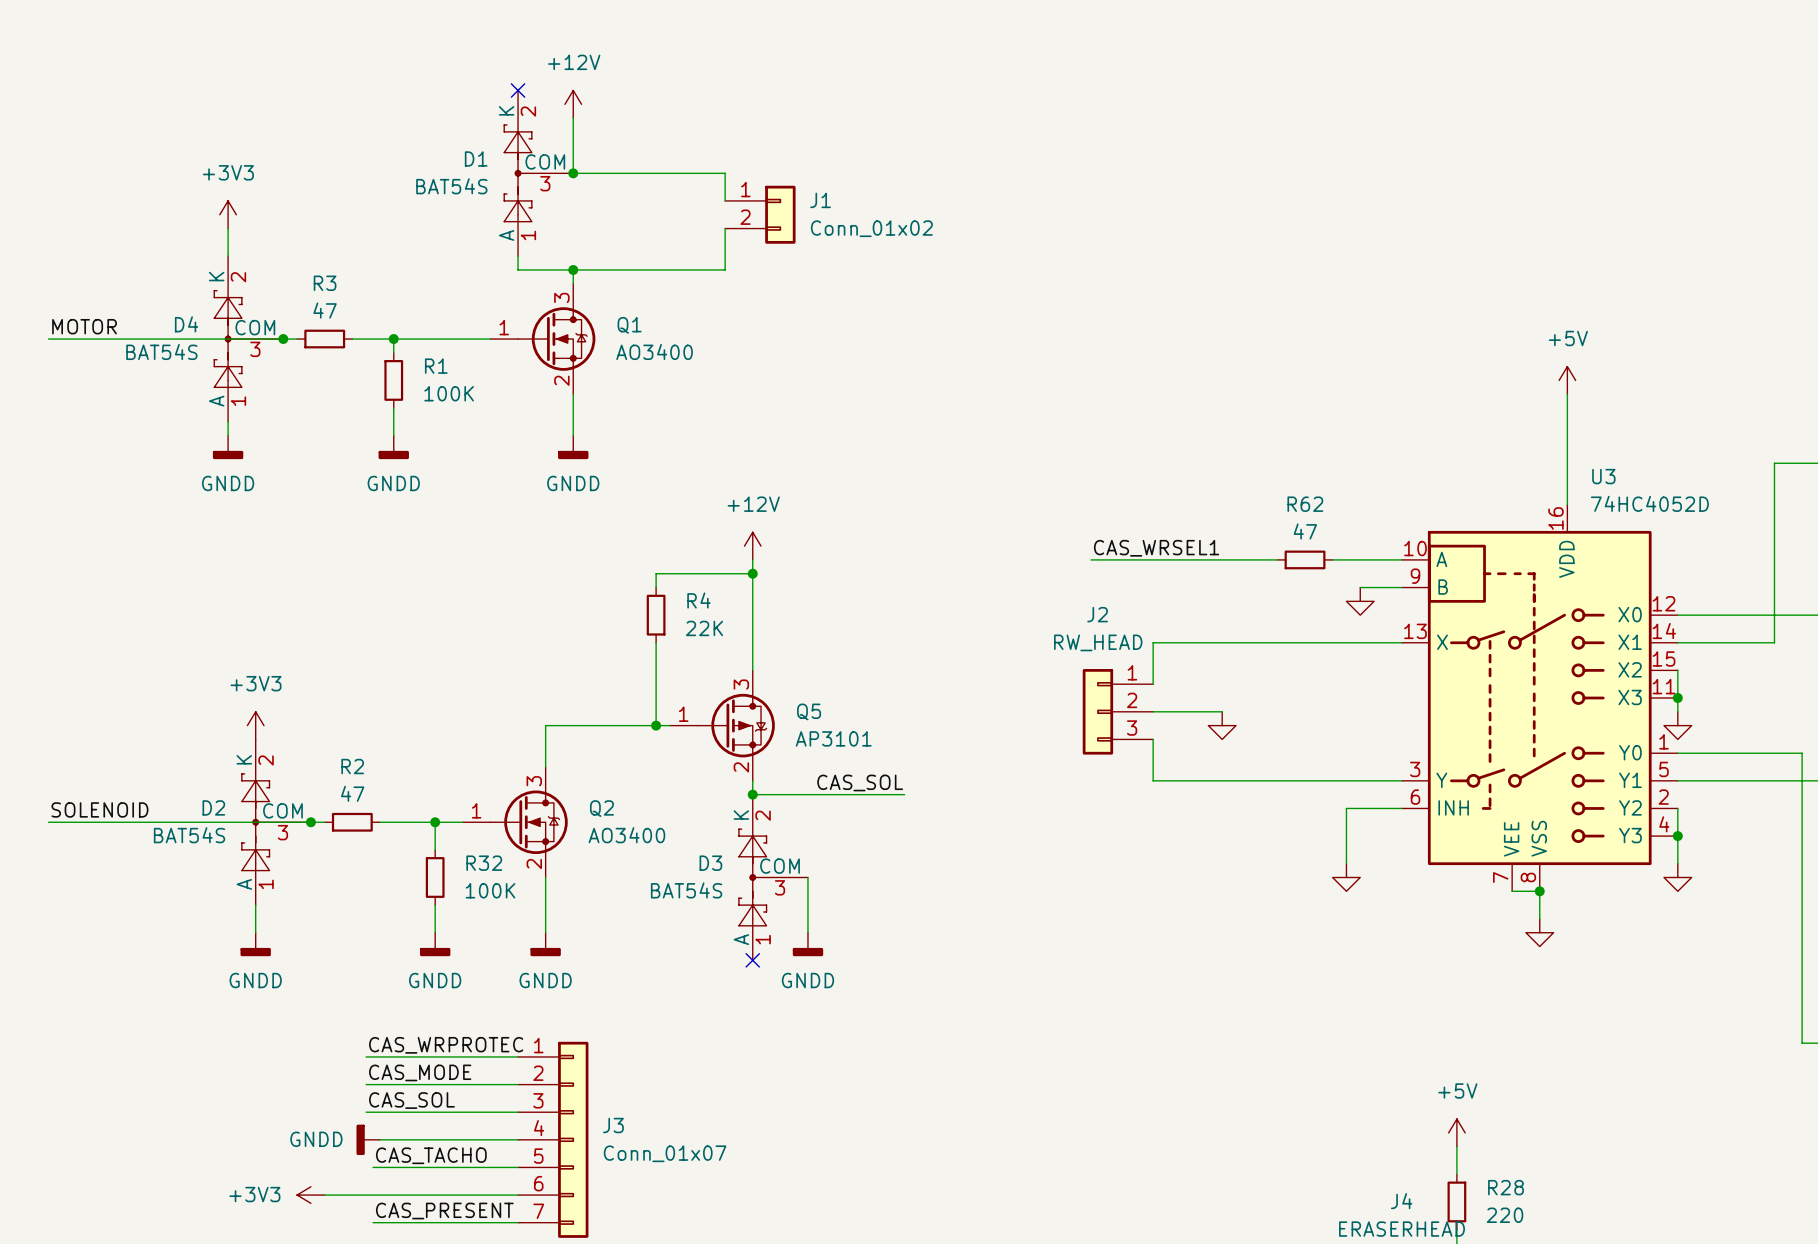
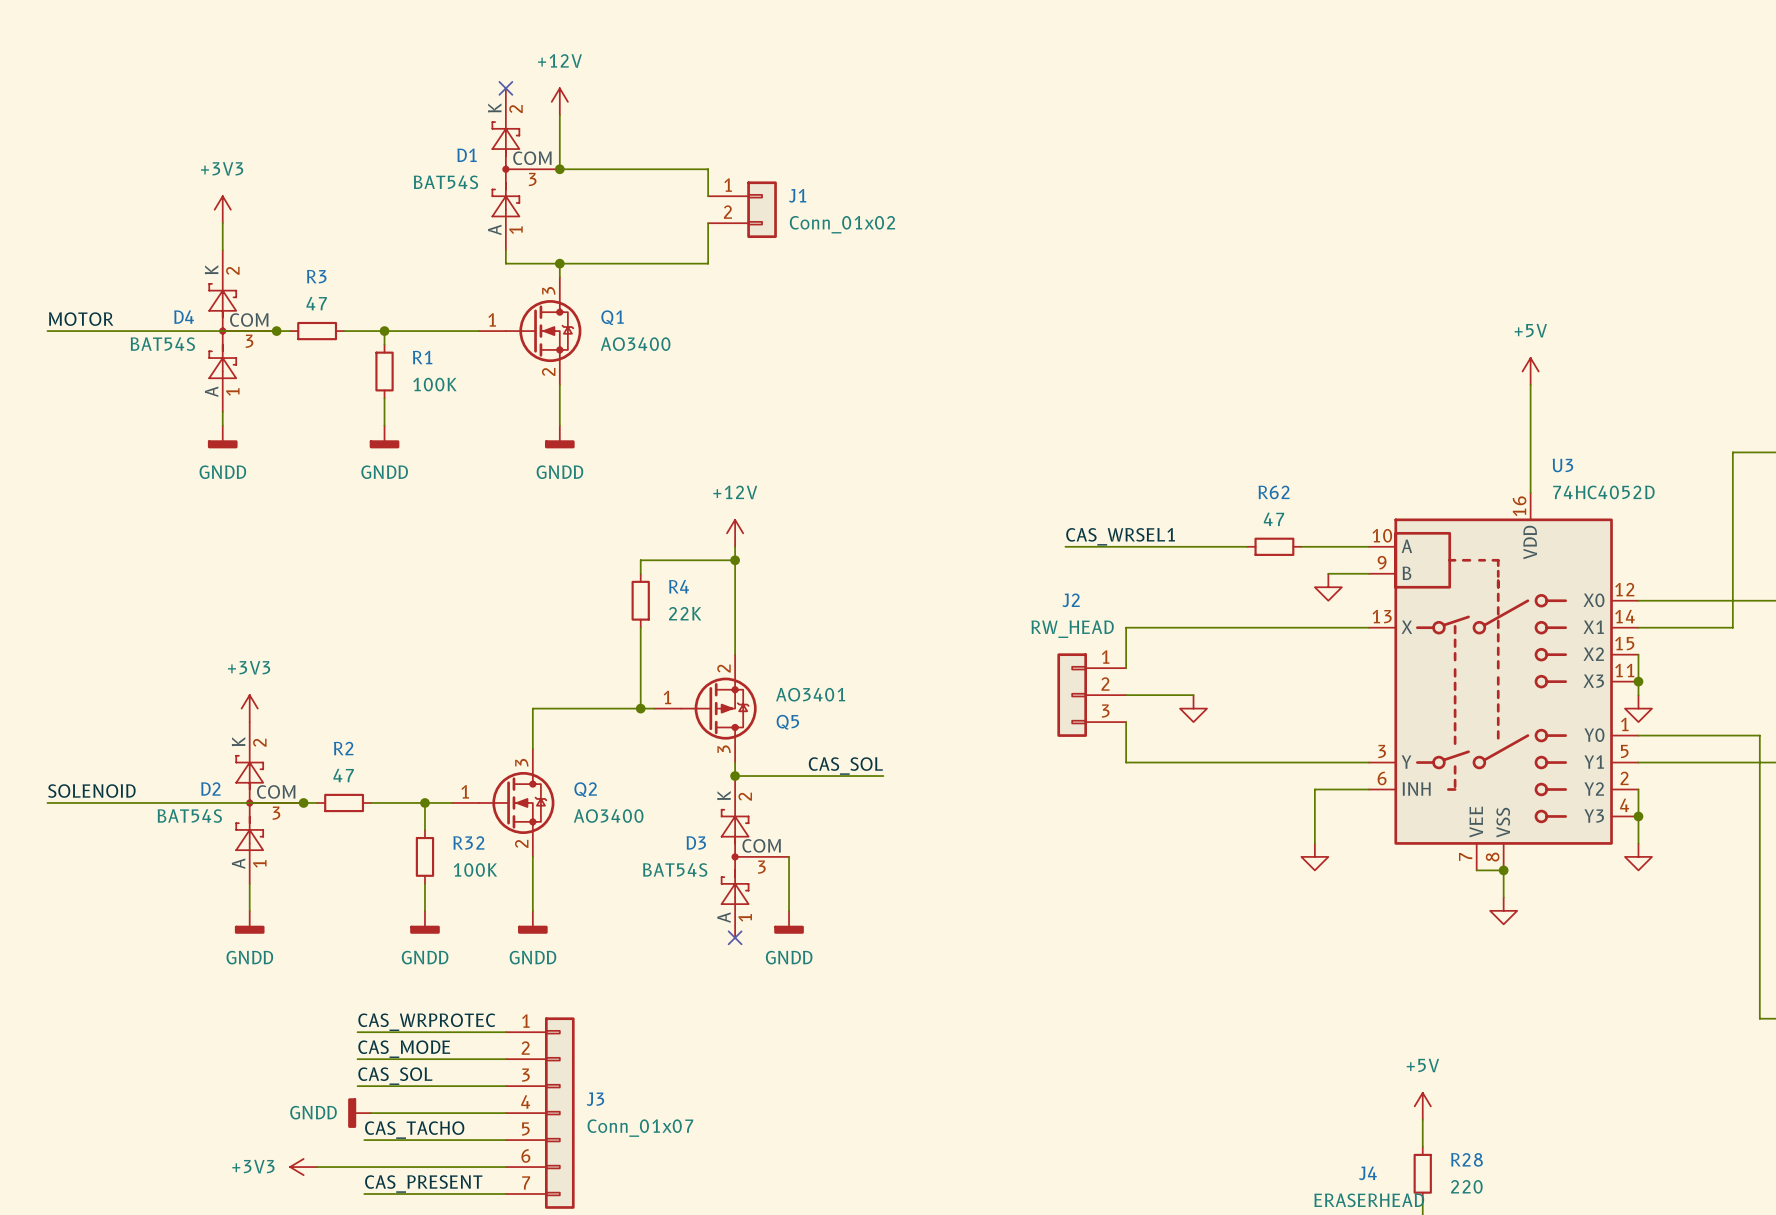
Q5 flip: as is (736, 725) -> up-down (718, 708)
Q5 value: AP3101 (833, 738) -> AO3401 (810, 694)

